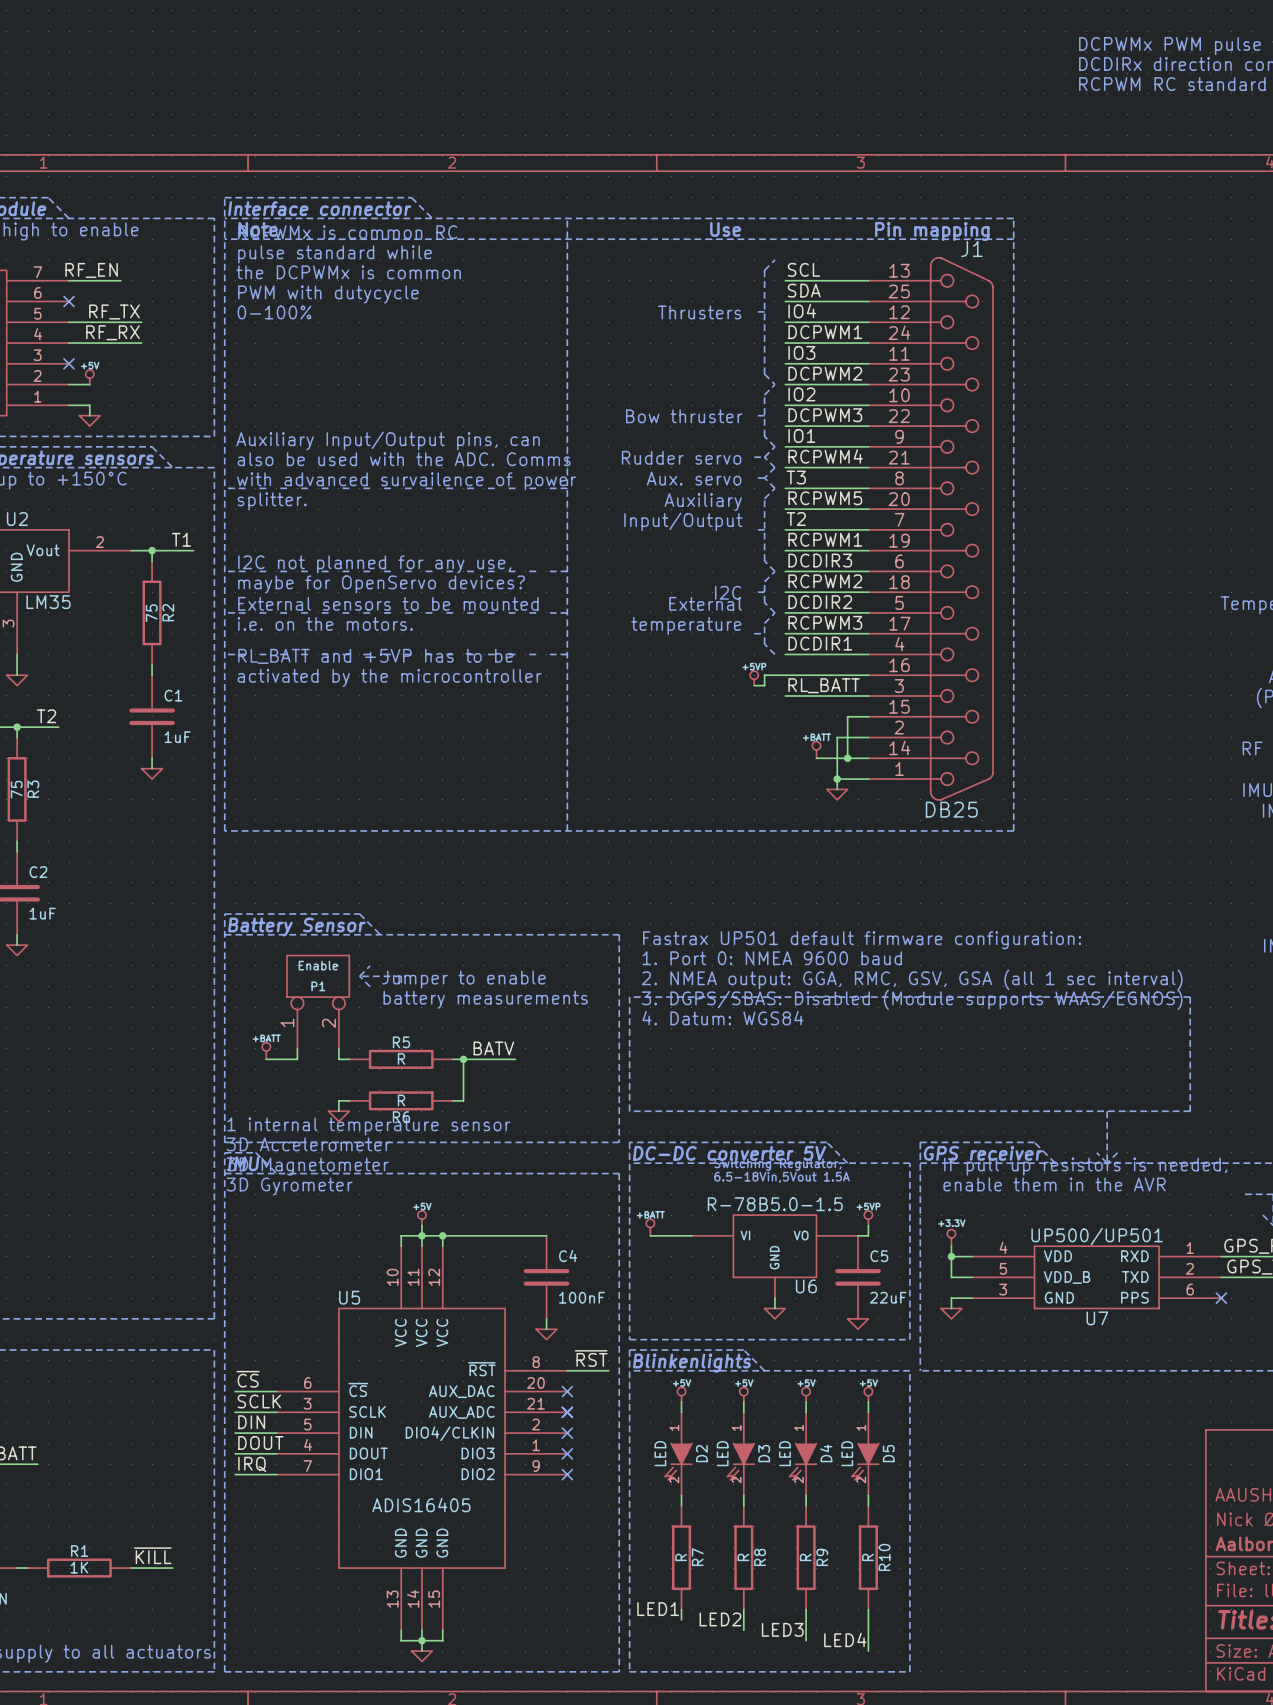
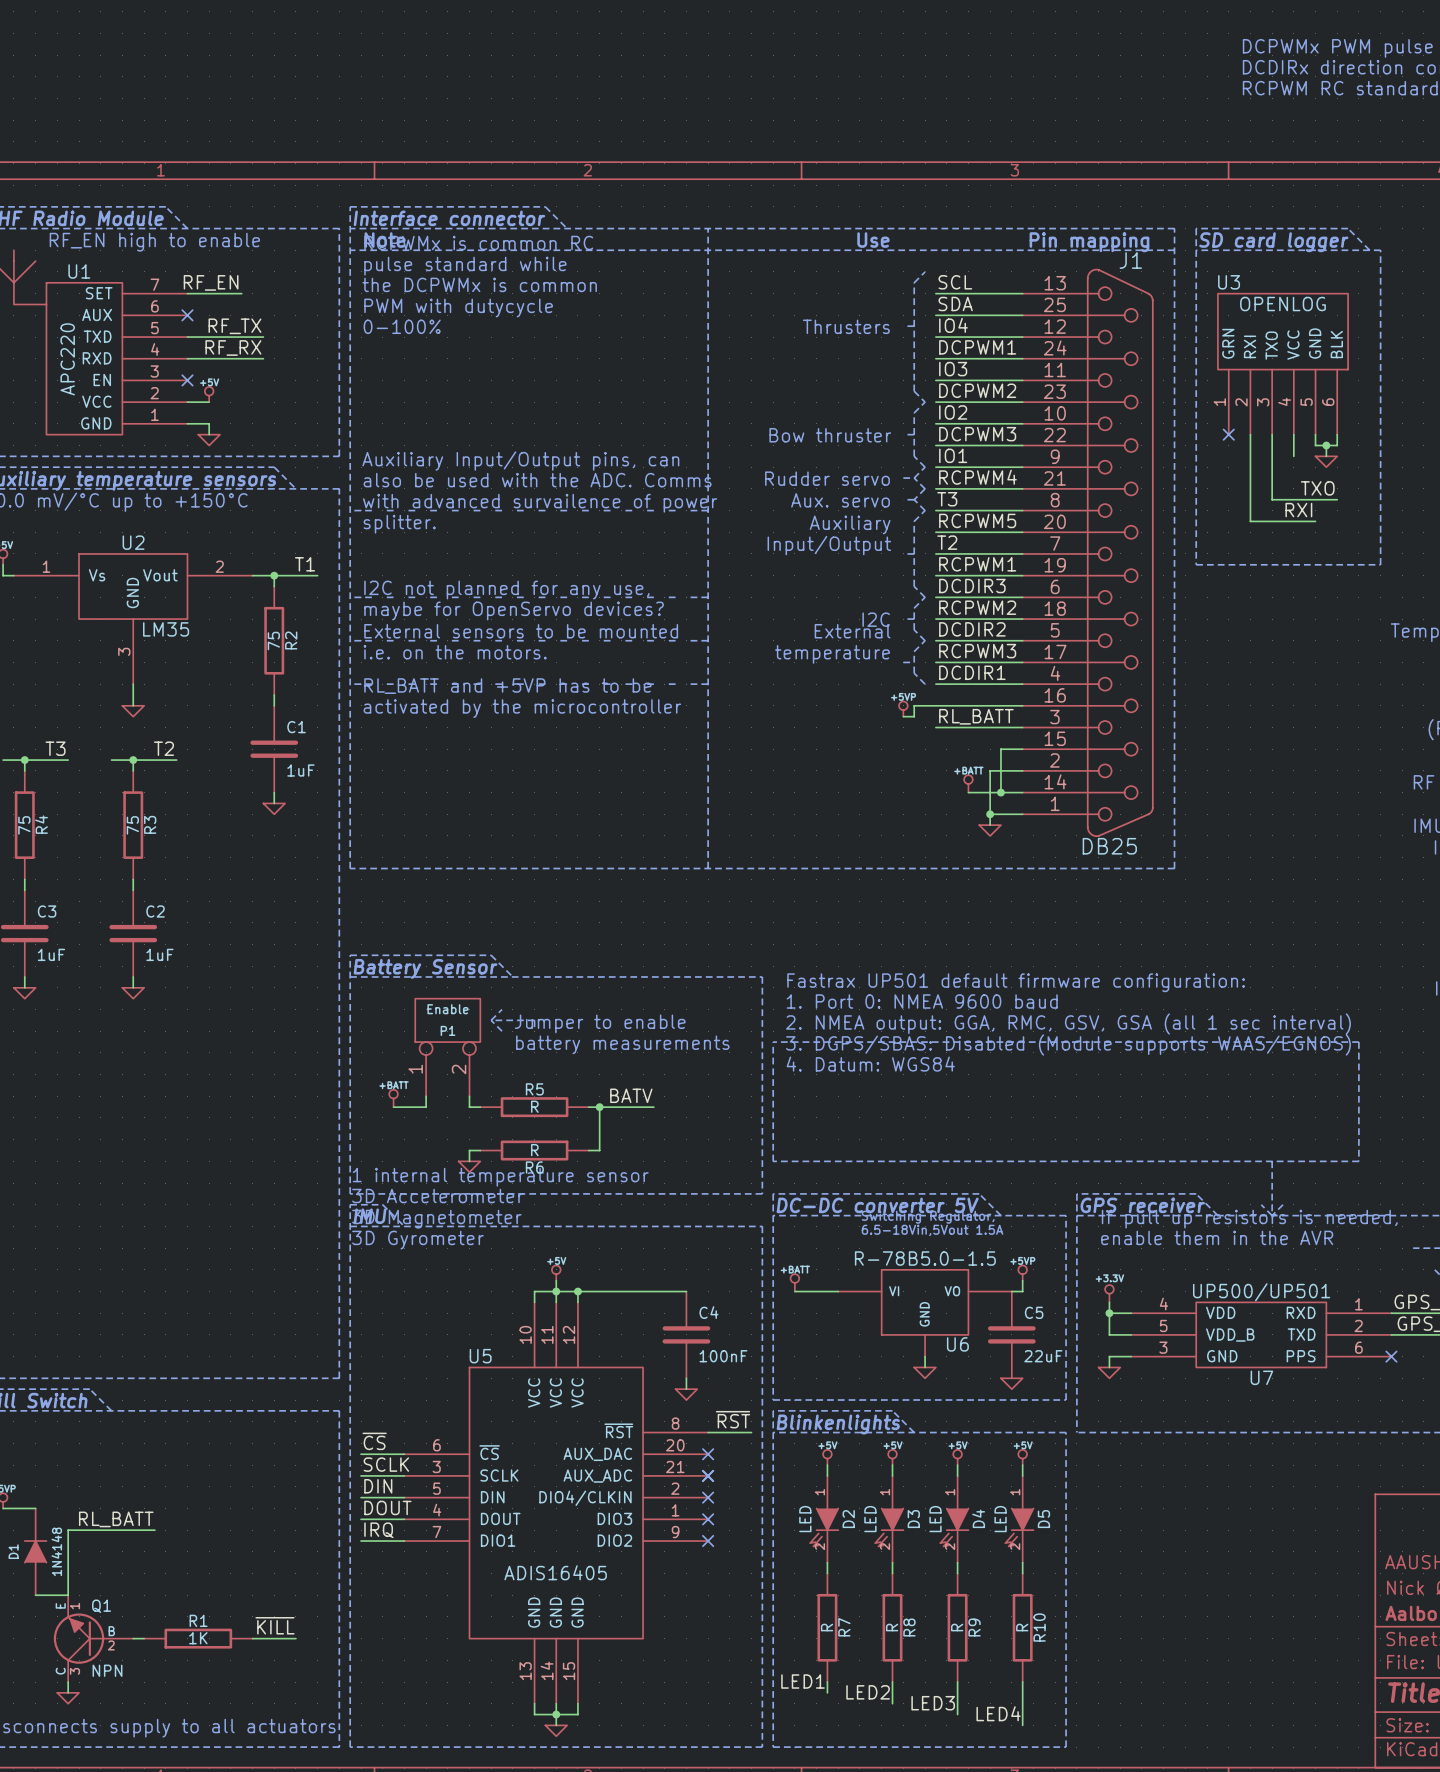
text: none -> SD card logger (1273, 242)
line: none -> (1196, 250) (1380, 250) (1380, 564) (1196, 564) (1196, 228) (1348, 228) (1369, 250)
U3: none -> OPENLOG (1282, 364)
no-connect mark: none -> (1228, 434)
wire: none -> (1250, 434) (1250, 521) (1315, 521)
wire: none -> (1272, 434) (1272, 499) (1337, 499)
wire: none -> (1293, 434) (1293, 456)
wire: none -> (1315, 434) (1315, 445) (1337, 445) (1337, 434)
wire: none -> (1326, 445) (1326, 456)
junction: none -> (1326, 445)
power symbol: none -> (1326, 461)
label: none -> TXO (1317, 488)
label: none -> RXI (1298, 510)

